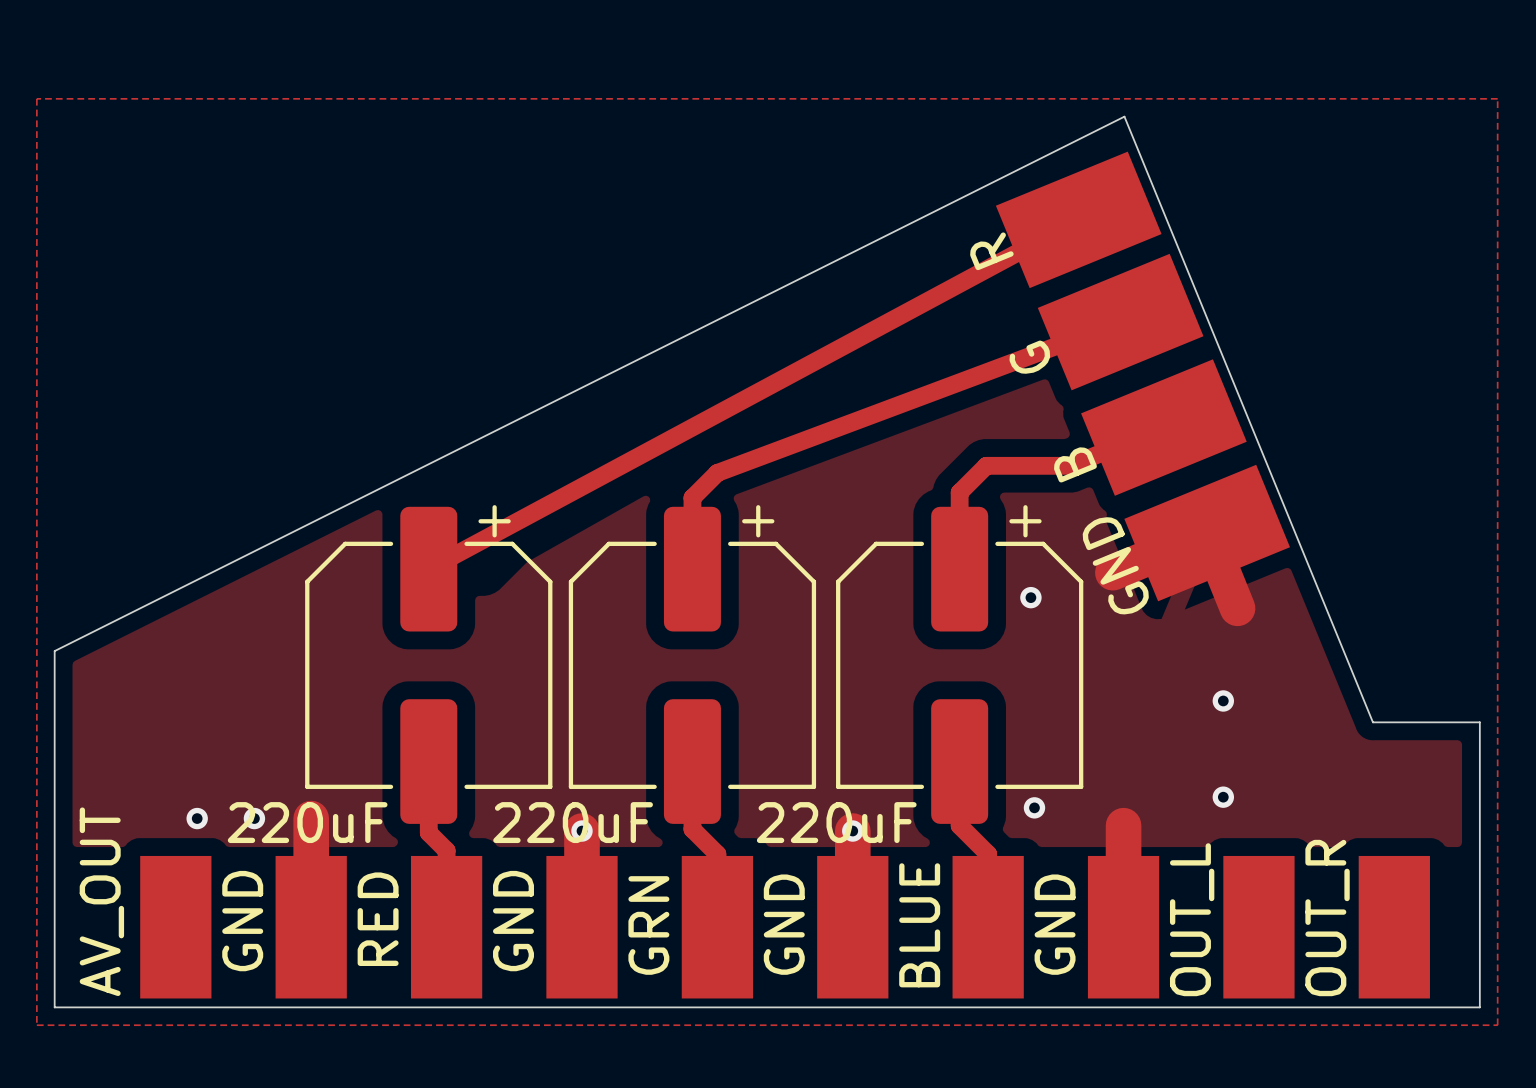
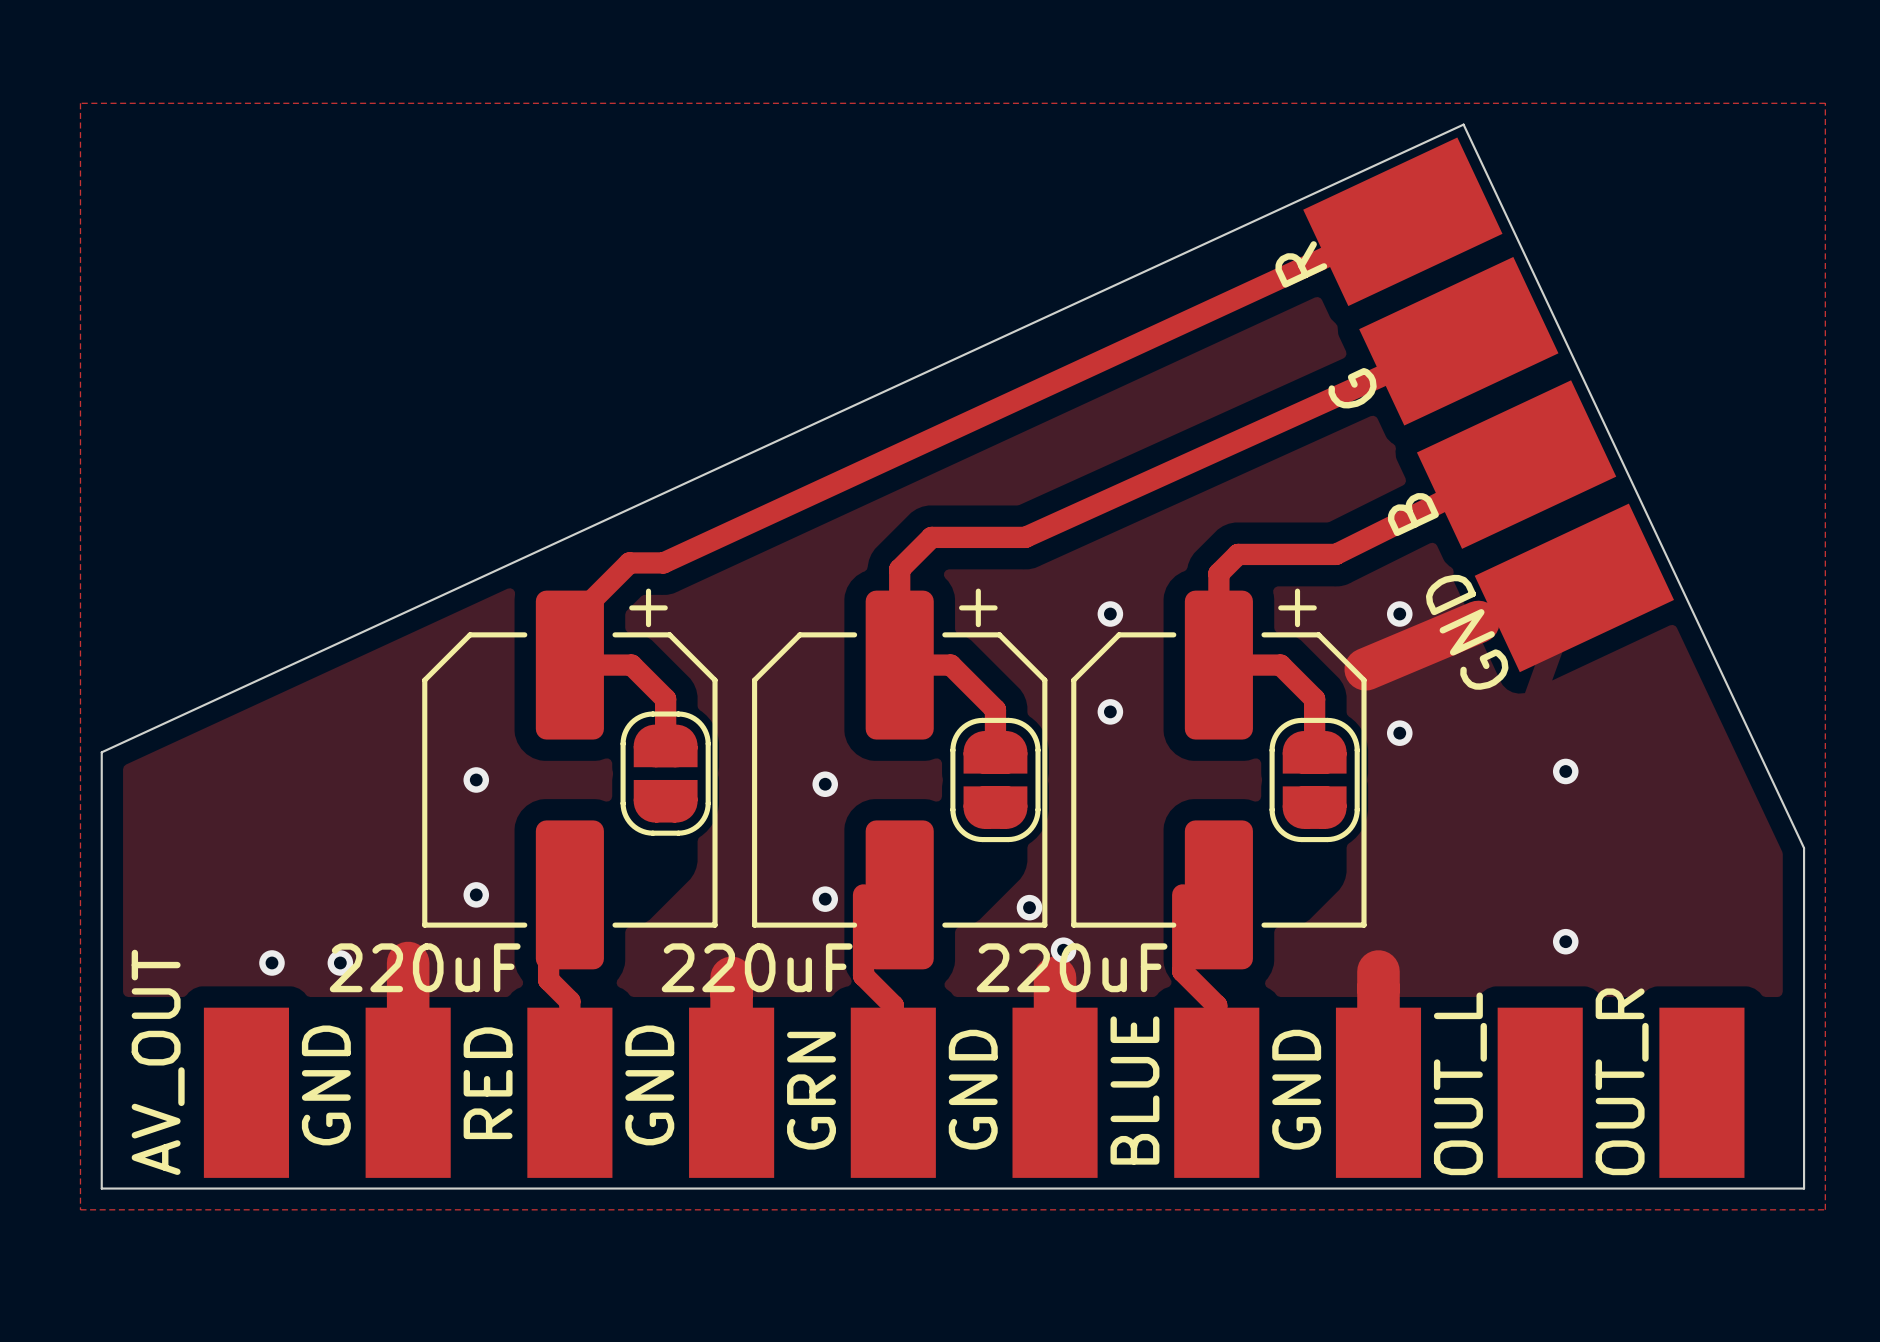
track: none -> (1402, 221) (663, 562) (629, 562) (569, 622)
track: (1078, 219) (428, 569) -> none
track: none -> (1458, 341) (1025, 537) (931, 537) (899, 569) (899, 665) (950, 665) (995, 709) (995, 752)
track: (1120, 322) (717, 472) (692, 497) (692, 569) -> none
part: none -> (1488, 404)
part: (1142, 376) -> none
track: (1163, 427) (1070, 465) (986, 465) (959, 492) (959, 569) -> none
track: none -> (1469, 511) (1516, 464) (1335, 554) (1238, 554) (1218, 573) (1218, 665) (1280, 665) (1314, 699) (1314, 752)
part footprint: [568, 505, 817, 824] -> [752, 588, 1048, 970]
part footprint: [836, 505, 1084, 824] -> [1071, 588, 1367, 970]
track: none -> (569, 614) (569, 665) (631, 665) (665, 699) (665, 745)
via: none -> (1110, 614)
via: none -> (1399, 614)
track: (1223, 549) (1207, 533) (1237, 608) -> none
via: (1030, 597) -> none
via: none -> (1110, 711)
via: none -> (1399, 733)
board edge: (54, 651) (1124, 116) (1372, 722) (1479, 722) -> (101, 762) (101, 752) (1463, 124) (1804, 848)
via: none -> (1565, 771)
part: none -> (665, 773)
part position: (428, 664) -> (569, 778)
via: none -> (476, 779)
part: none -> (995, 779)
part: none -> (1314, 779)
via: none -> (825, 784)
via: (1223, 700) -> none
via: none -> (476, 894)
via: none -> (825, 899)
via: none -> (1029, 907)
via: (1223, 797) -> none
via: none -> (1565, 941)
via: (1034, 807) -> none
part value position: 220uF (573, 822) -> 220uF (757, 967)
part value position: 220uF (836, 822) -> 220uF (1072, 967)
via: (581, 831) -> none
via position: (852, 831) -> (1063, 950)

